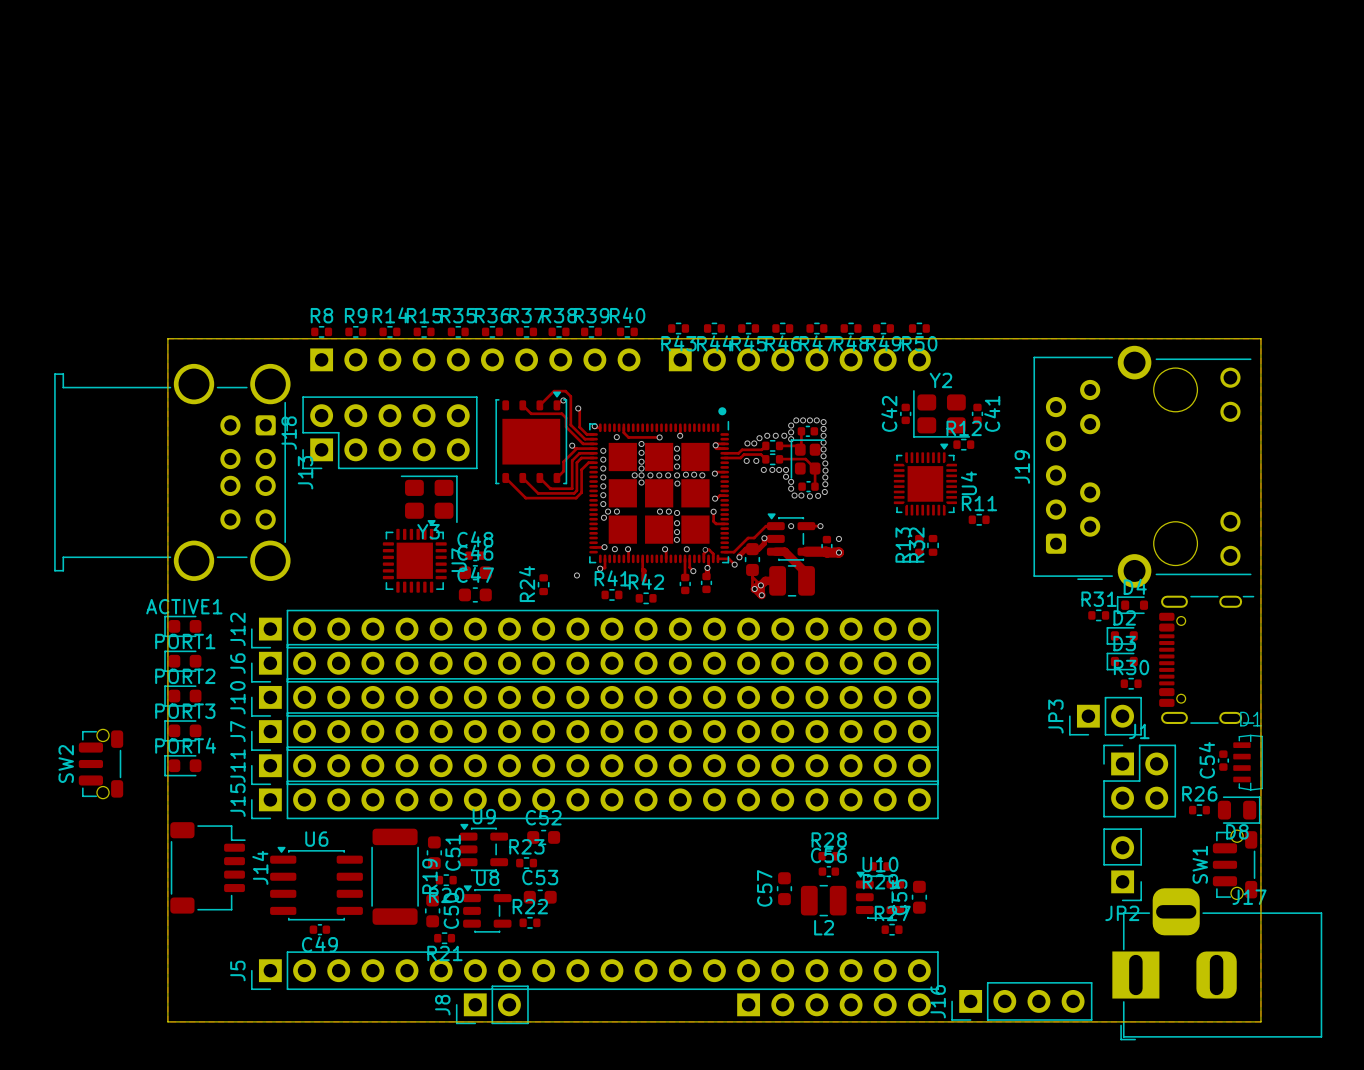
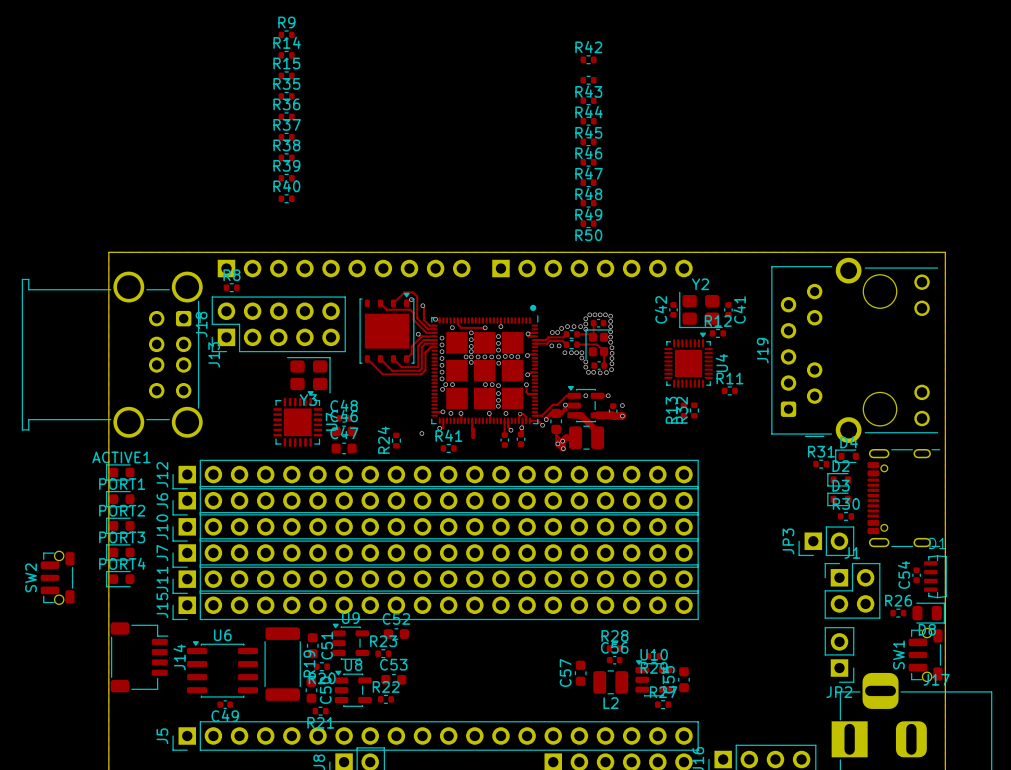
R43 position: (678, 328) -> (588, 80)
R44 position: (714, 328) -> (588, 100)
R45 position: (748, 328) -> (588, 121)
R46 position: (782, 328) -> (588, 141)
R47 position: (816, 328) -> (588, 162)
R48 position: (851, 328) -> (588, 182)
R49 position: (883, 328) -> (588, 203)
R50 position: (919, 328) -> (588, 223)
R8 position: (321, 331) -> (231, 287)
R9 position: (355, 331) -> (286, 34)
R14 position: (389, 331) -> (286, 55)
R15 position: (424, 331) -> (286, 75)
R35 position: (458, 331) -> (286, 96)
R36 position: (492, 331) -> (286, 116)
R37 position: (526, 331) -> (286, 137)
R38 position: (559, 331) -> (286, 157)
R39 position: (591, 331) -> (286, 178)
R40 position: (627, 331) -> (286, 198)
R42 position: (646, 598) -> (588, 59)

